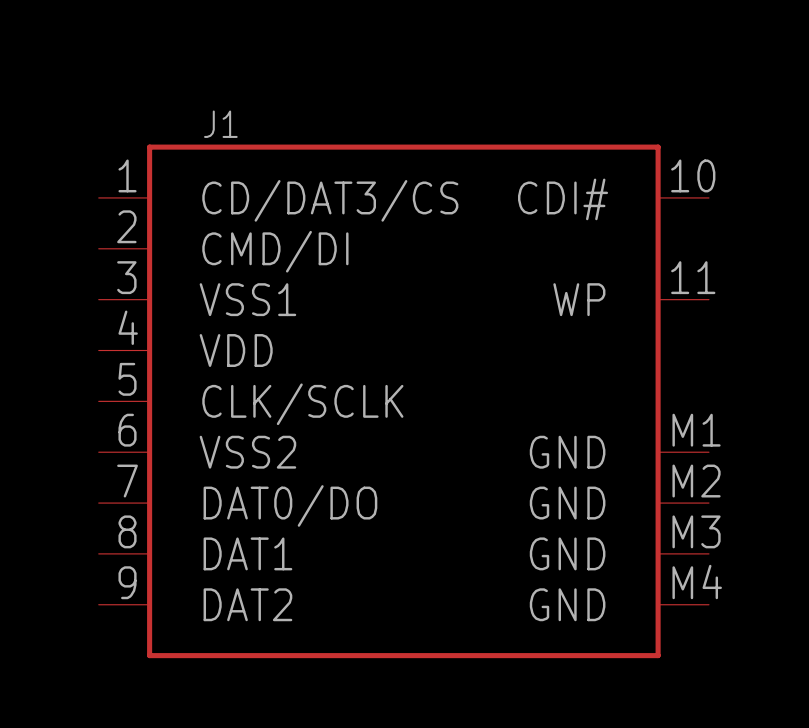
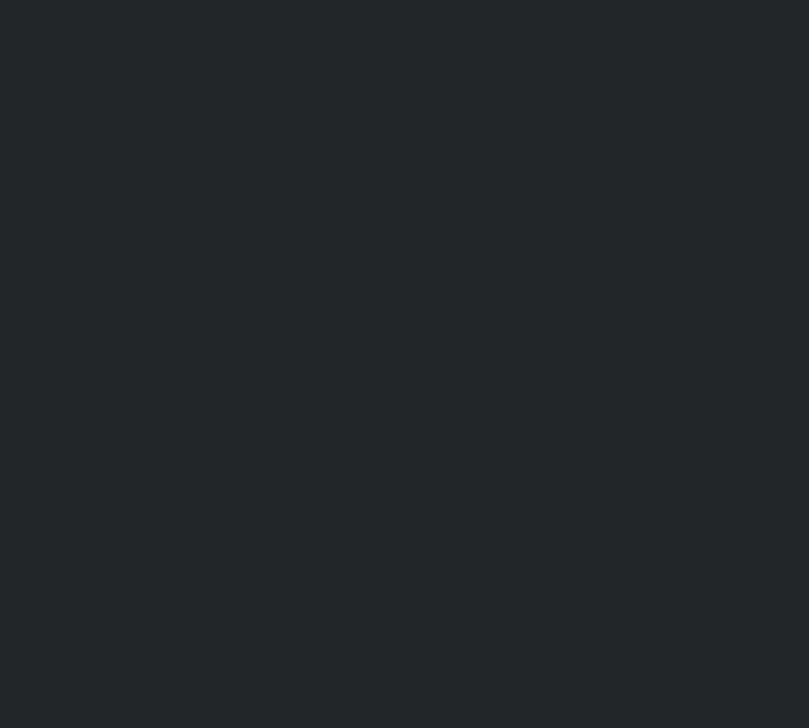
J1: (403, 401) -> none

